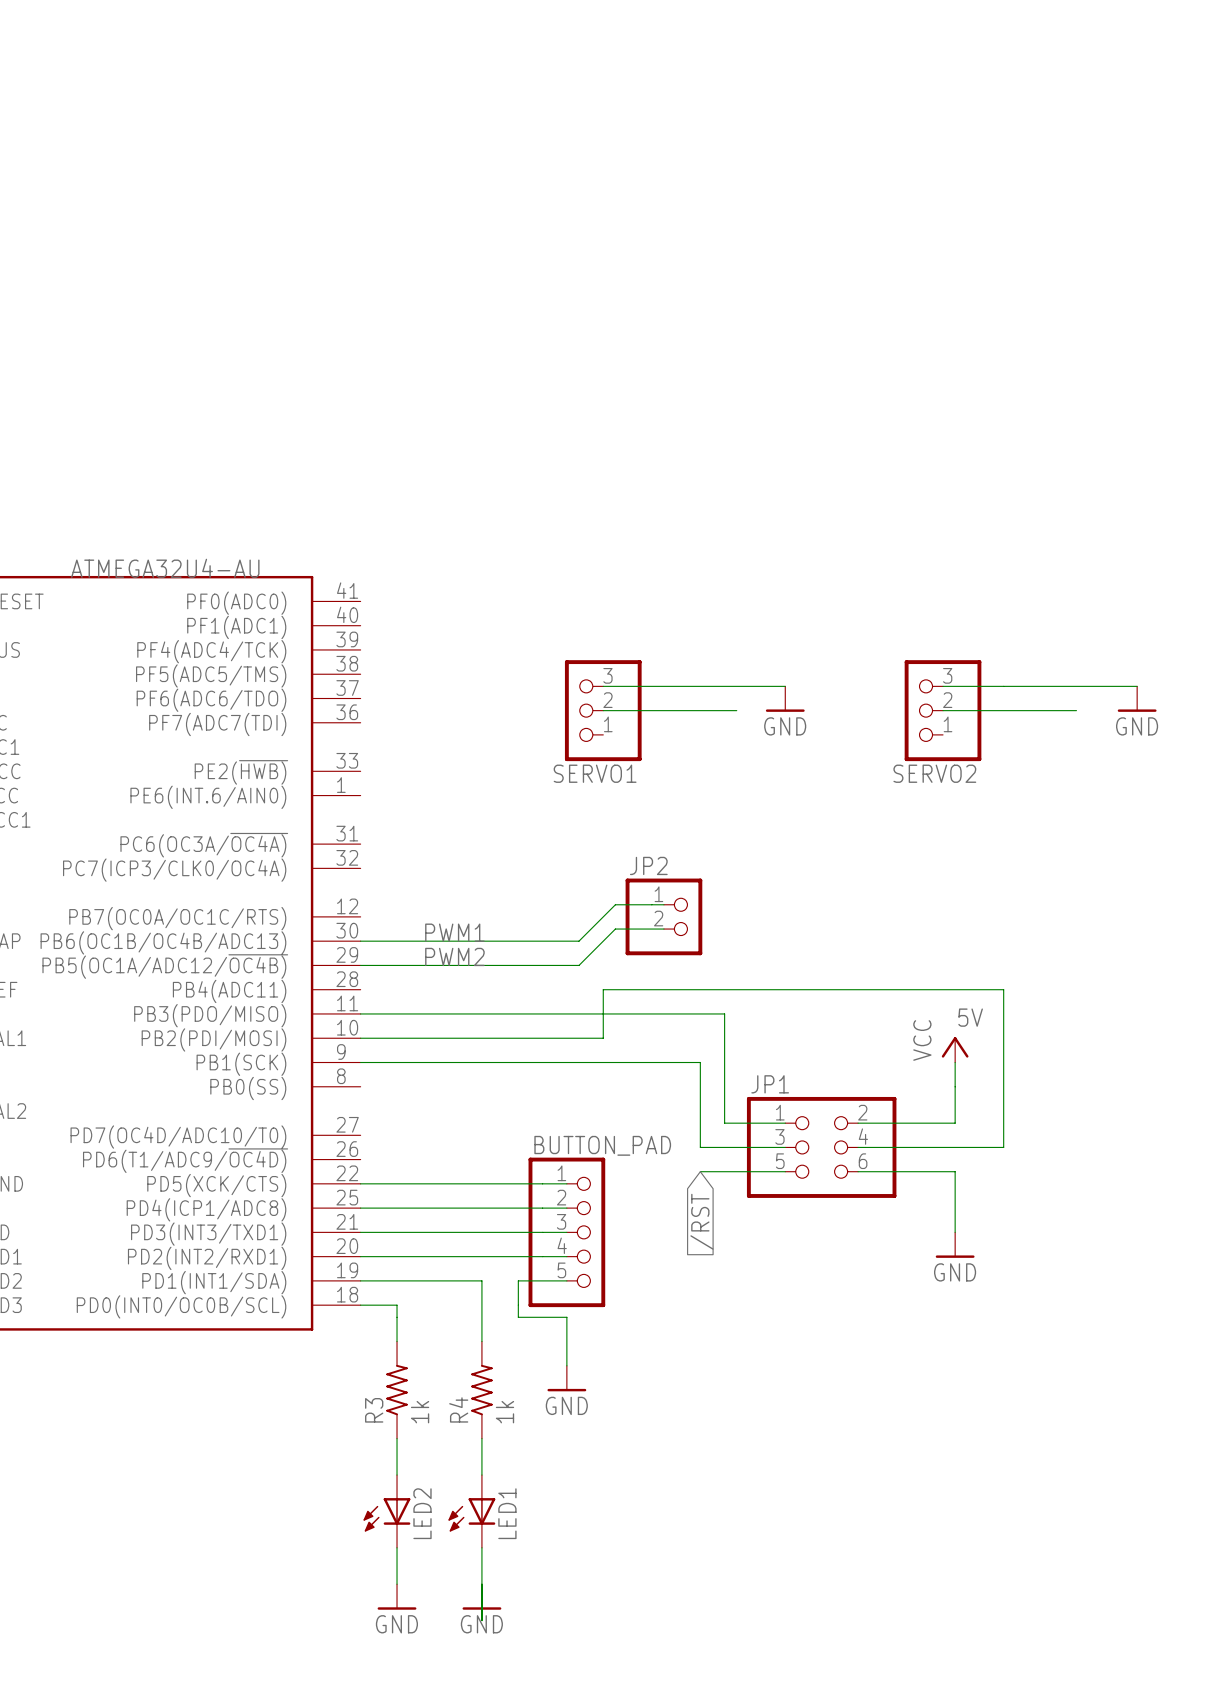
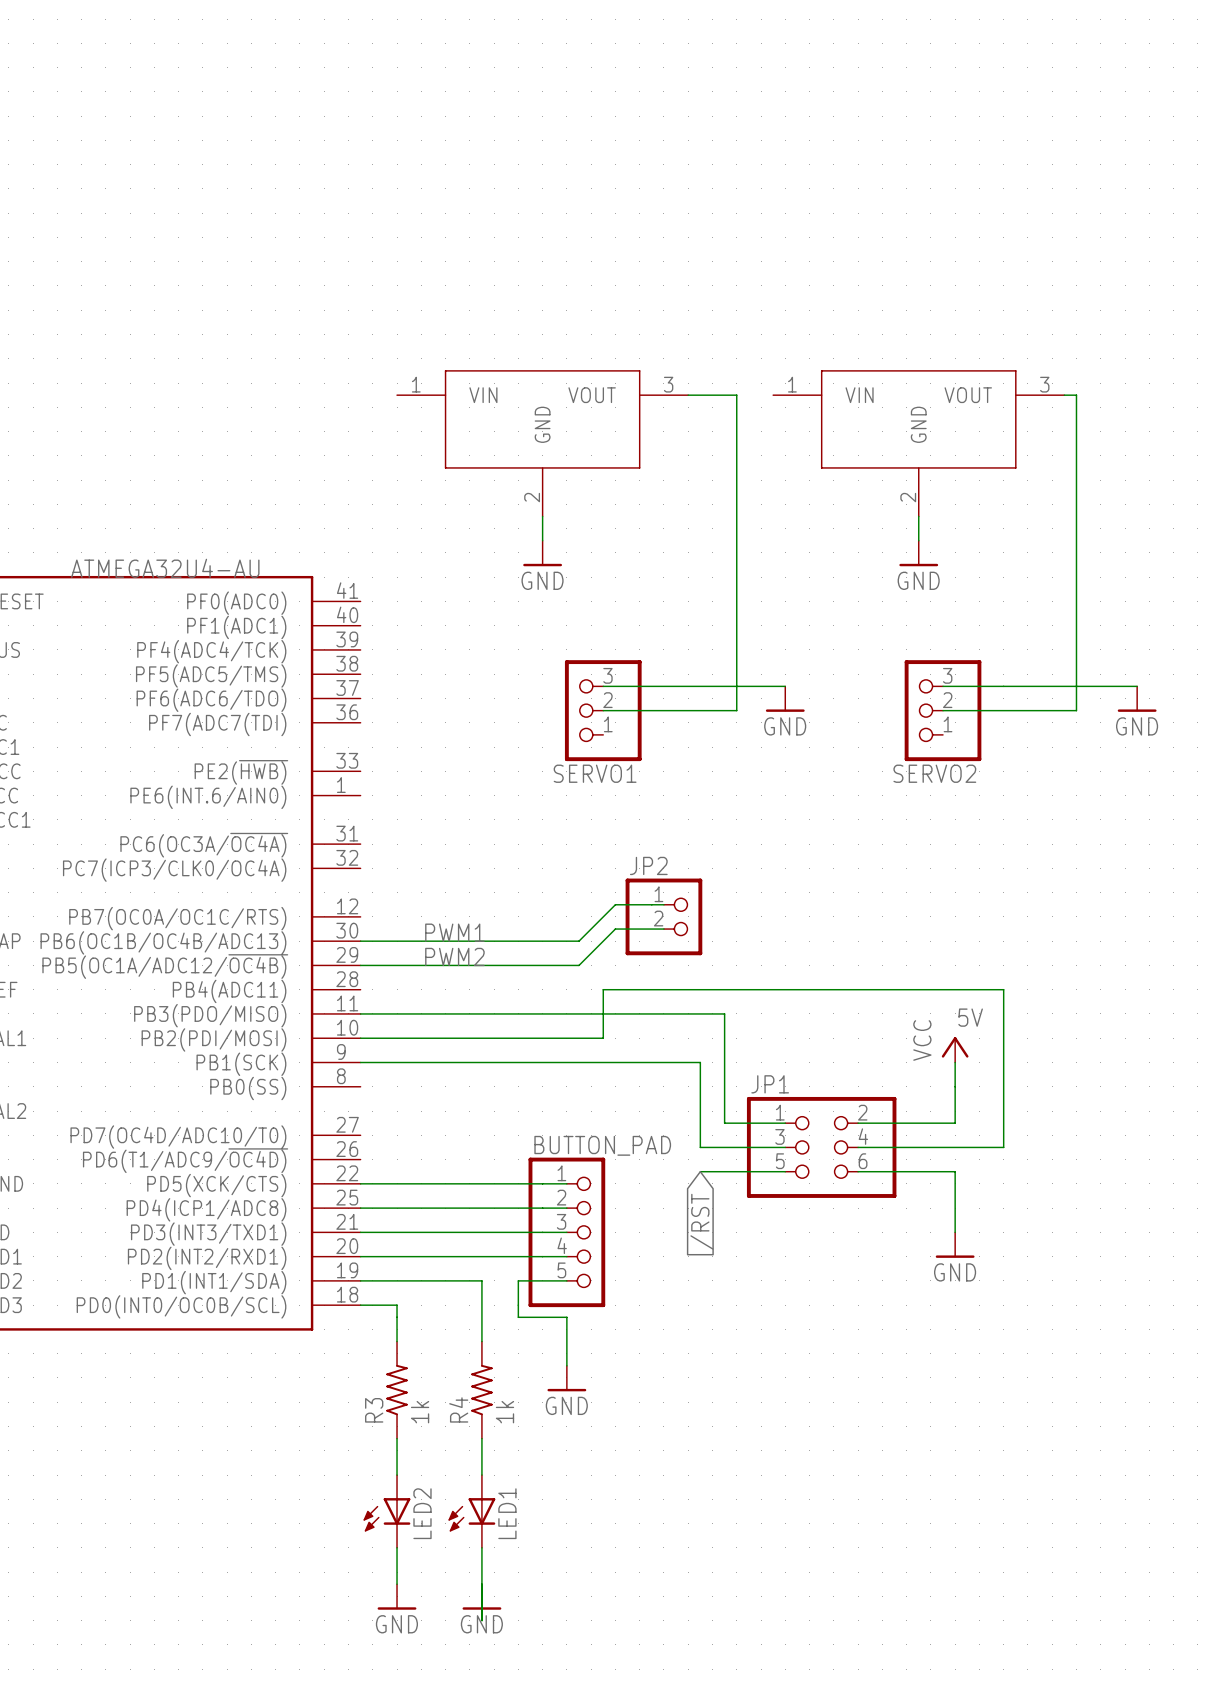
wire: none -> (688, 395) (736, 395) (736, 710)
wire: none -> (1064, 395) (1076, 395) (1076, 710)
part: none -> (542, 443)
part: none -> (918, 443)
wire: none -> (542, 516) (542, 540)
wire: none -> (918, 516) (918, 540)
power symbol: none -> GND (542, 553)
power symbol: none -> GND (918, 553)

